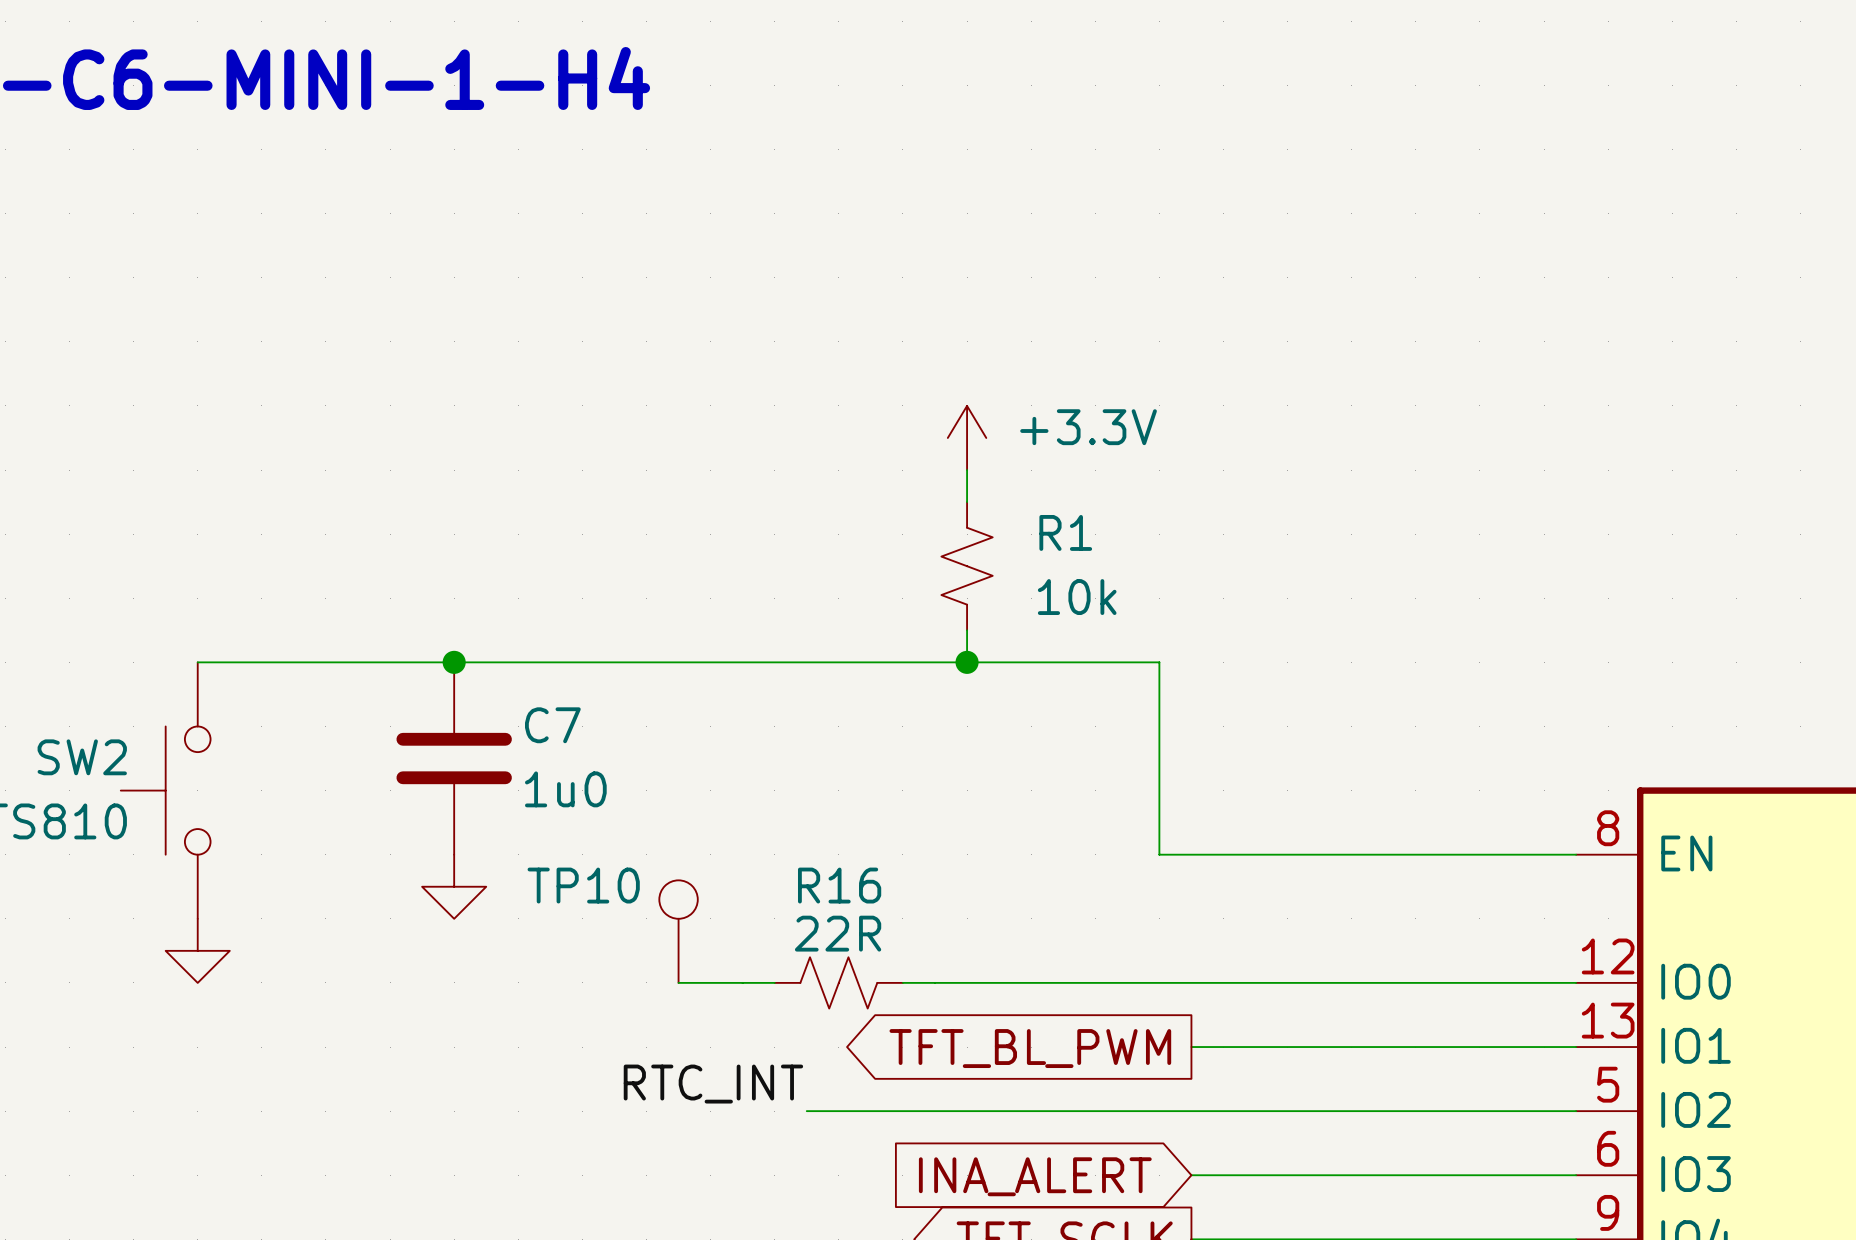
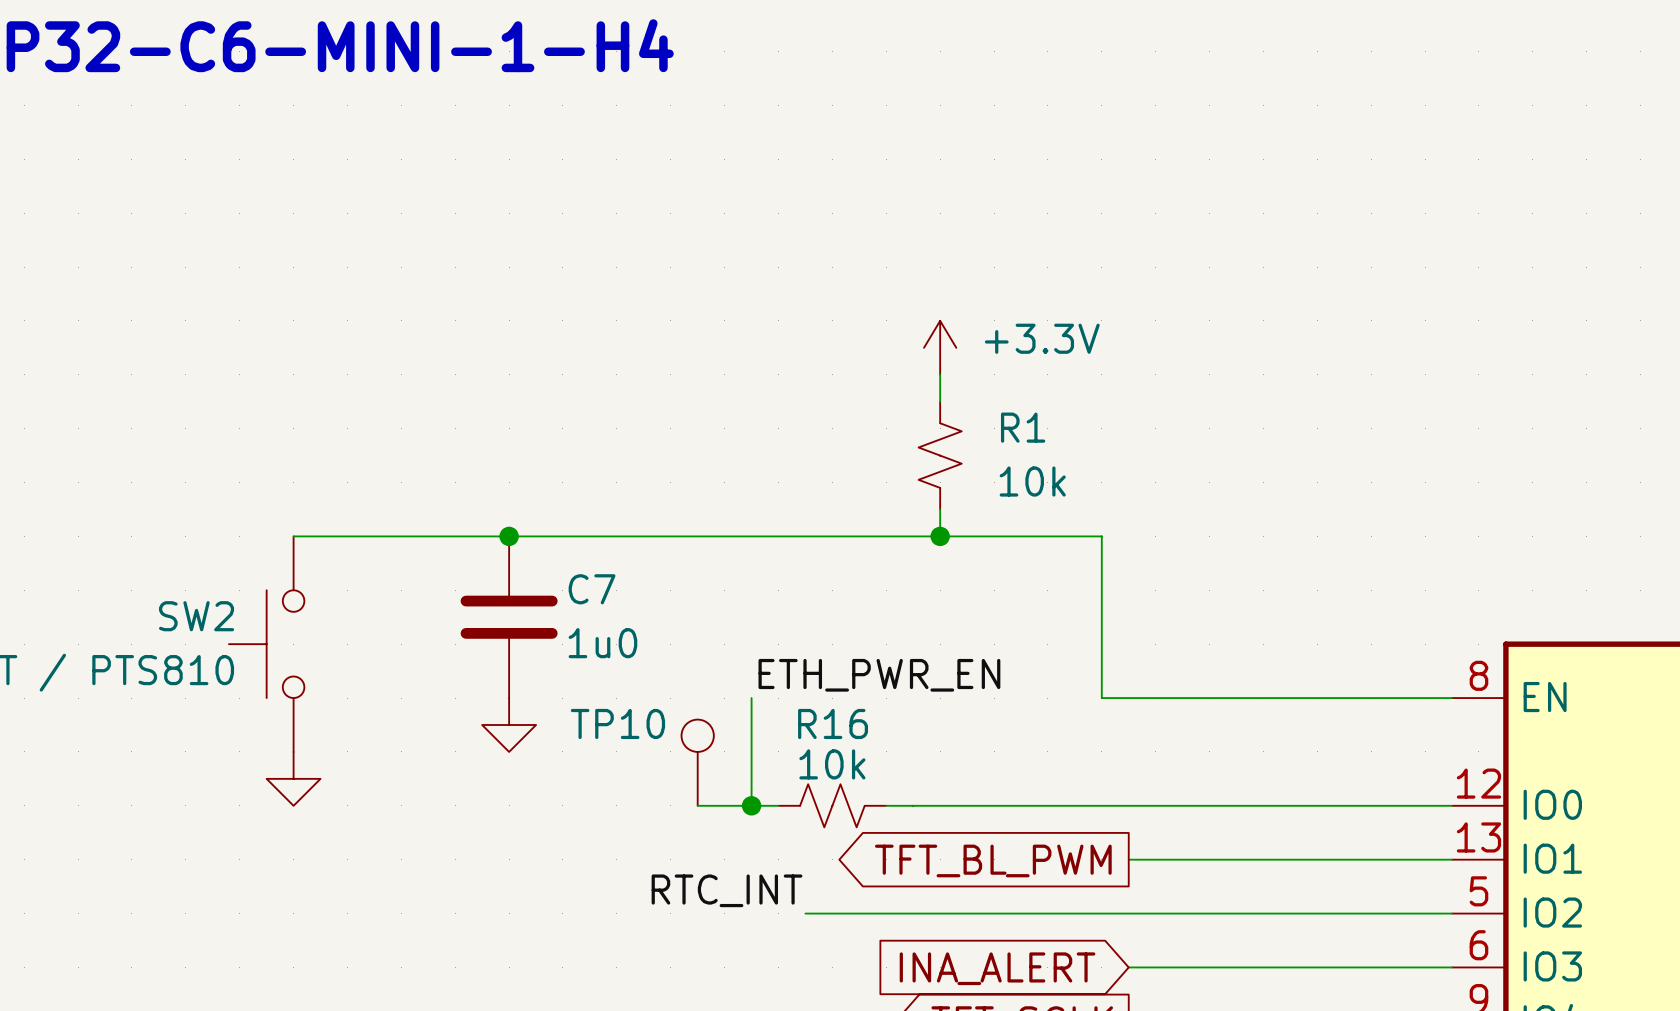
label: none -> ETH_PWR_EN (879, 675)
wire: none -> (751, 698) (751, 805)
R16 value: 22R (838, 933) -> 10k (832, 764)
junction: none -> (751, 805)

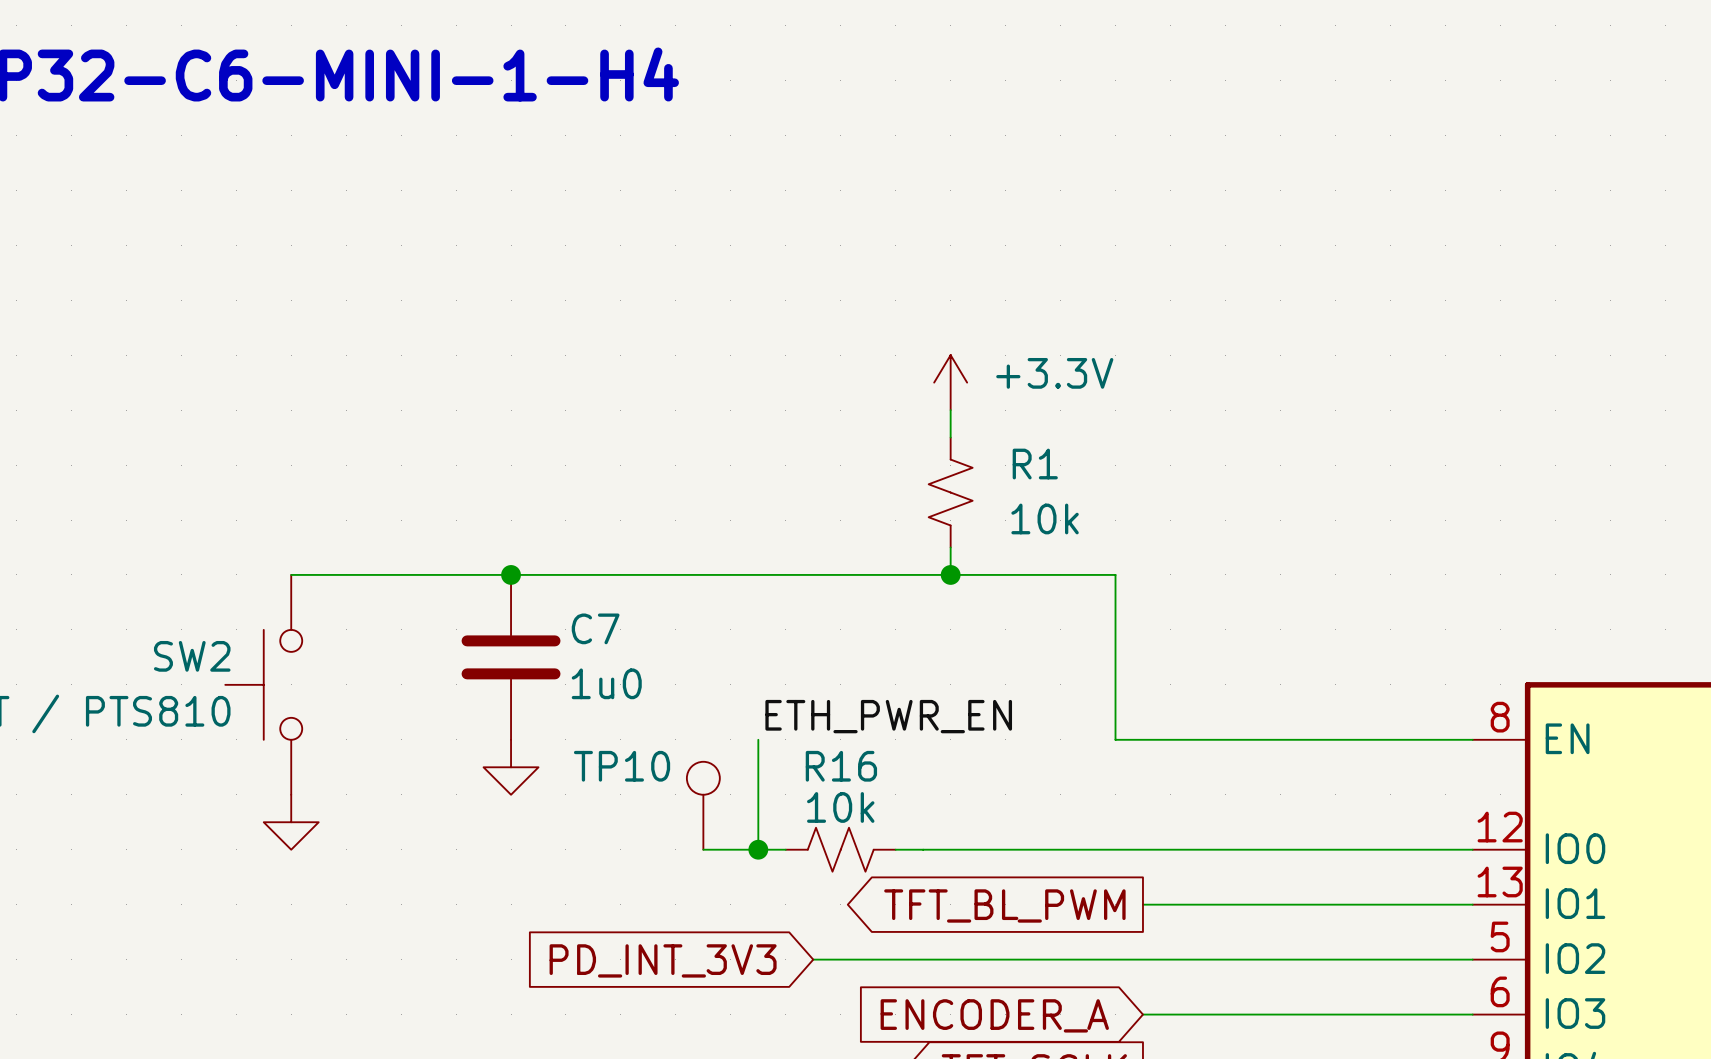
label: RTC_INT (727, 890) -> none
global label: none -> PD_INT_3V3 (663, 960)
global label: INA_ALERT (997, 968) -> ENCODER_A (994, 1015)

